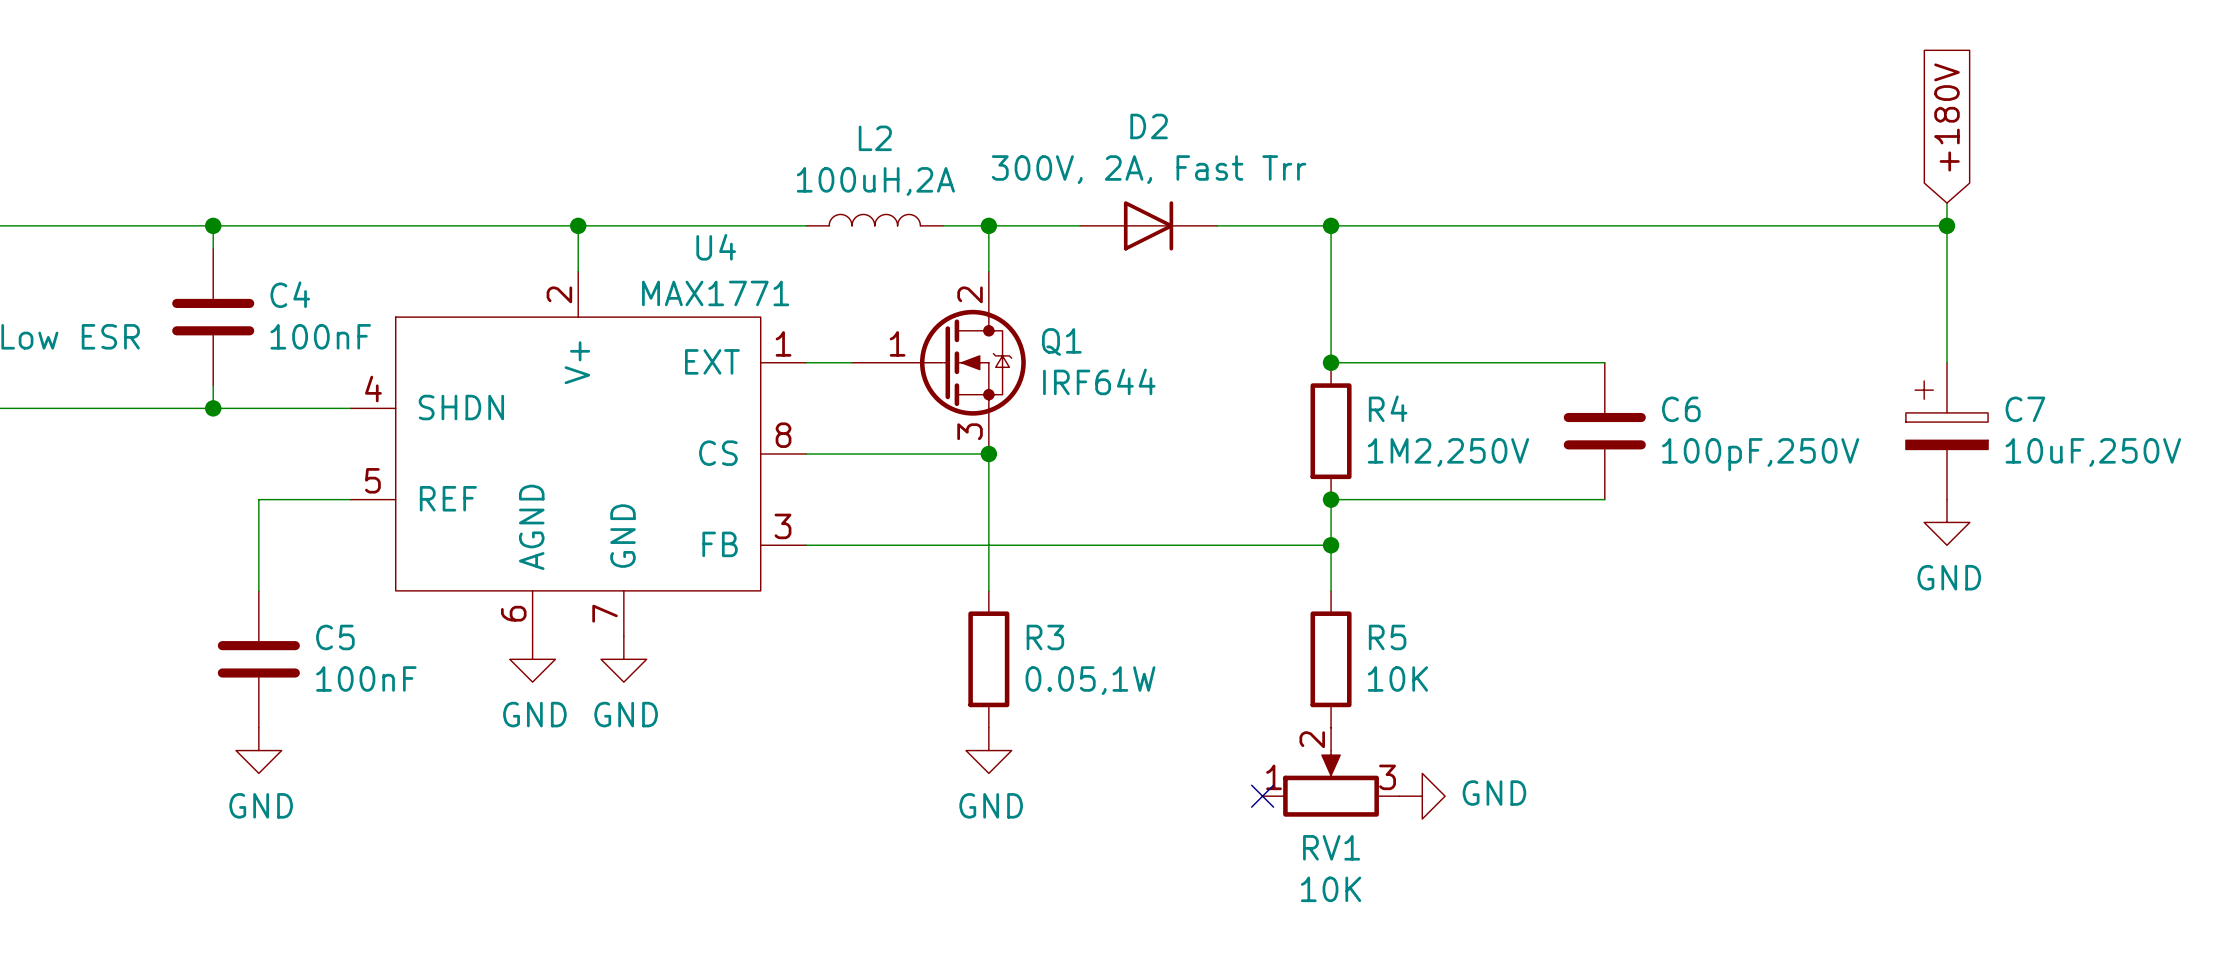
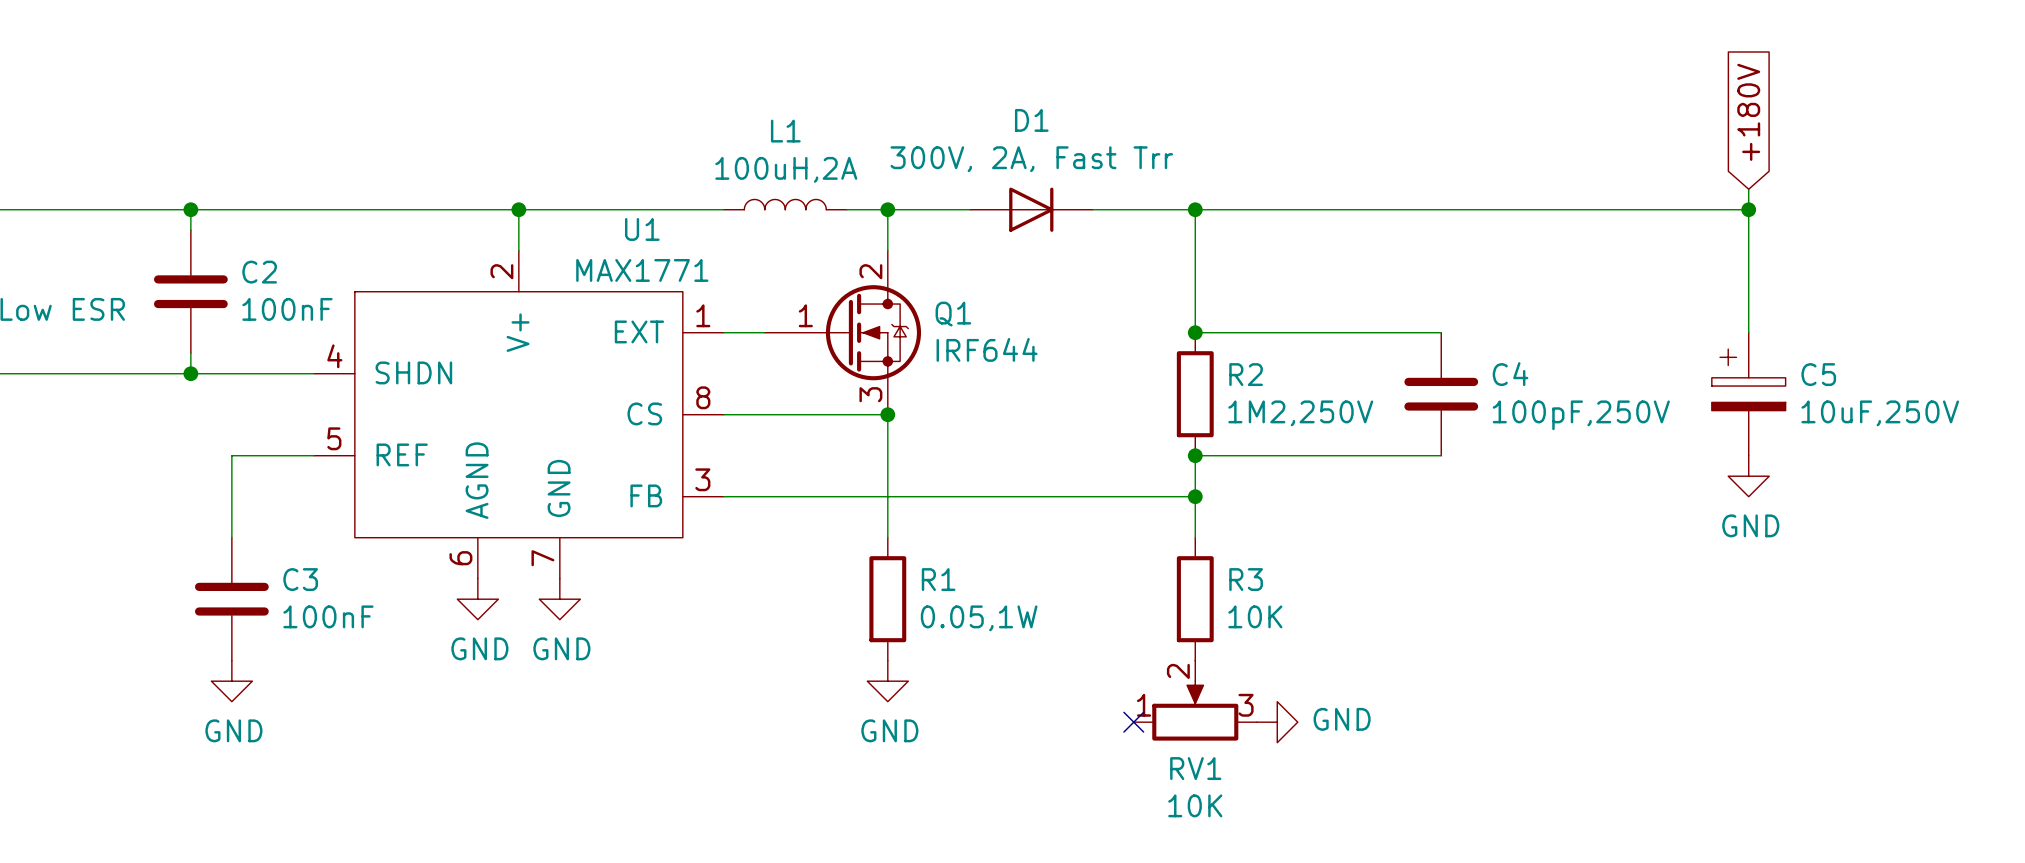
D2 name: D2 (1149, 126) -> D1 (1031, 120)
L2 name: L2 (875, 138) -> L1 (785, 131)
U4 name: U4 (716, 247) -> U1 (642, 229)
C4 name: C4 (290, 294) -> C2 (259, 272)
R4 name: R4 (1388, 408) -> R2 (1246, 374)
C6 name: C6 (1681, 409) -> C4 (1510, 374)
C7 name: C7 (2025, 409) -> C5 (1818, 374)
C5 name: C5 (335, 637) -> C3 (300, 579)
R3 name: R3 (1045, 637) -> R1 (938, 579)
R5 name: R5 (1387, 637) -> R3 (1246, 579)

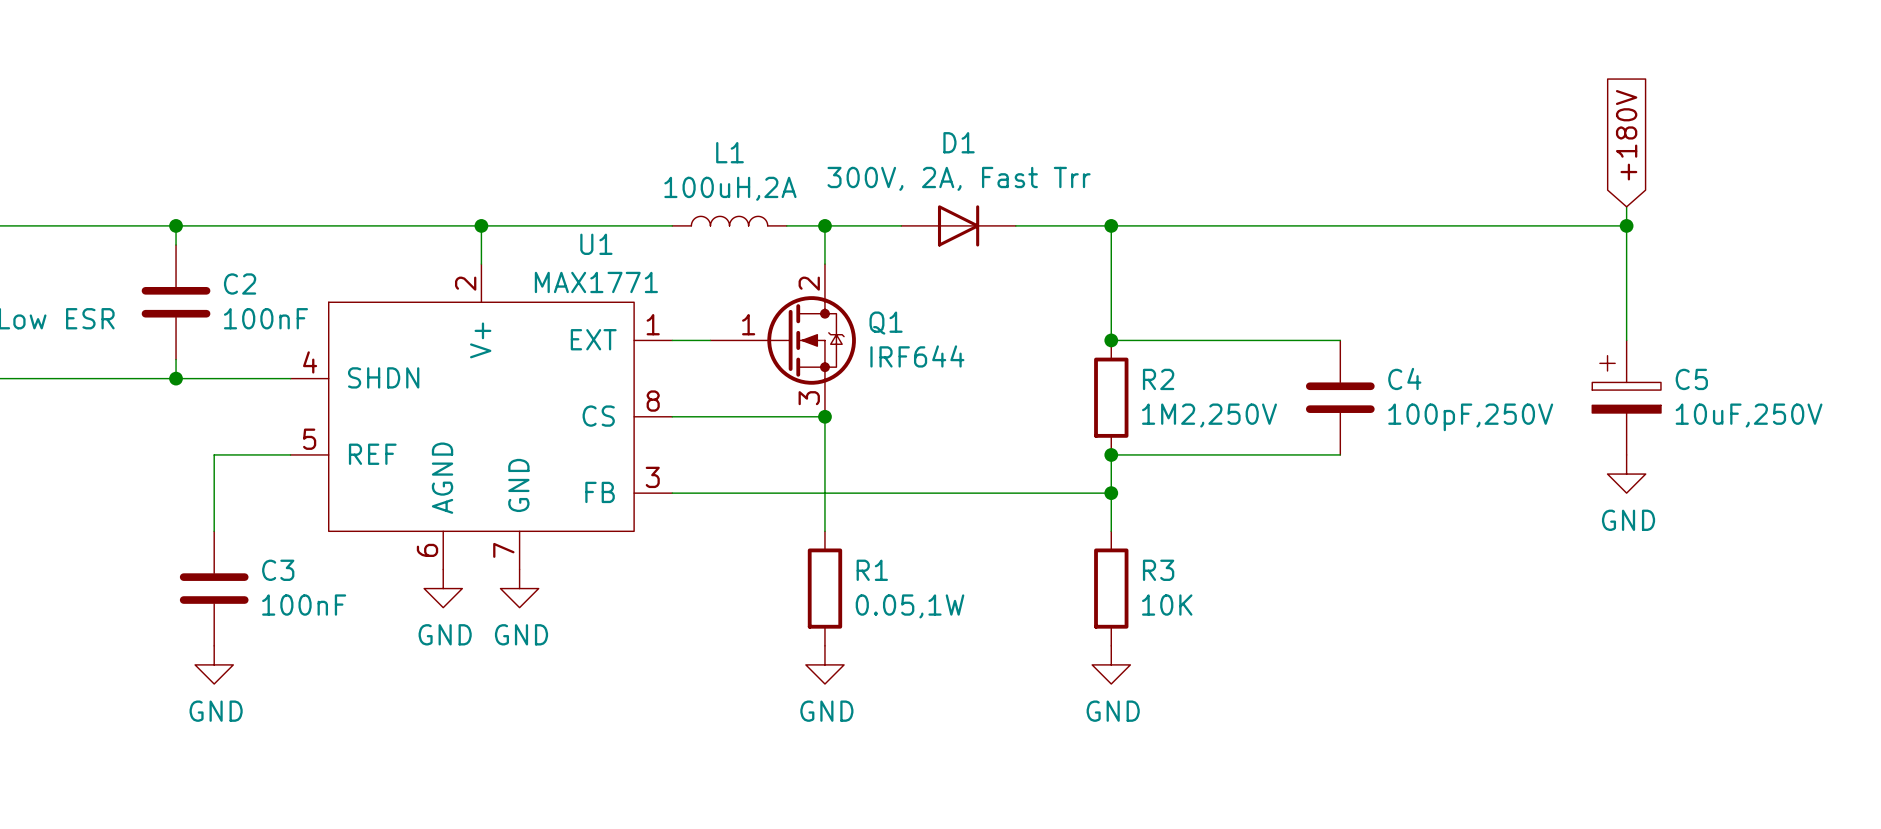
RV1: 10K (1195, 700) -> none
no-connect mark: (1133, 722) -> none
power symbol rotation: 0° (1277, 722) -> 90° clockwise (1111, 664)
power symbol position: GND (1277, 722) -> GND (1111, 664)

